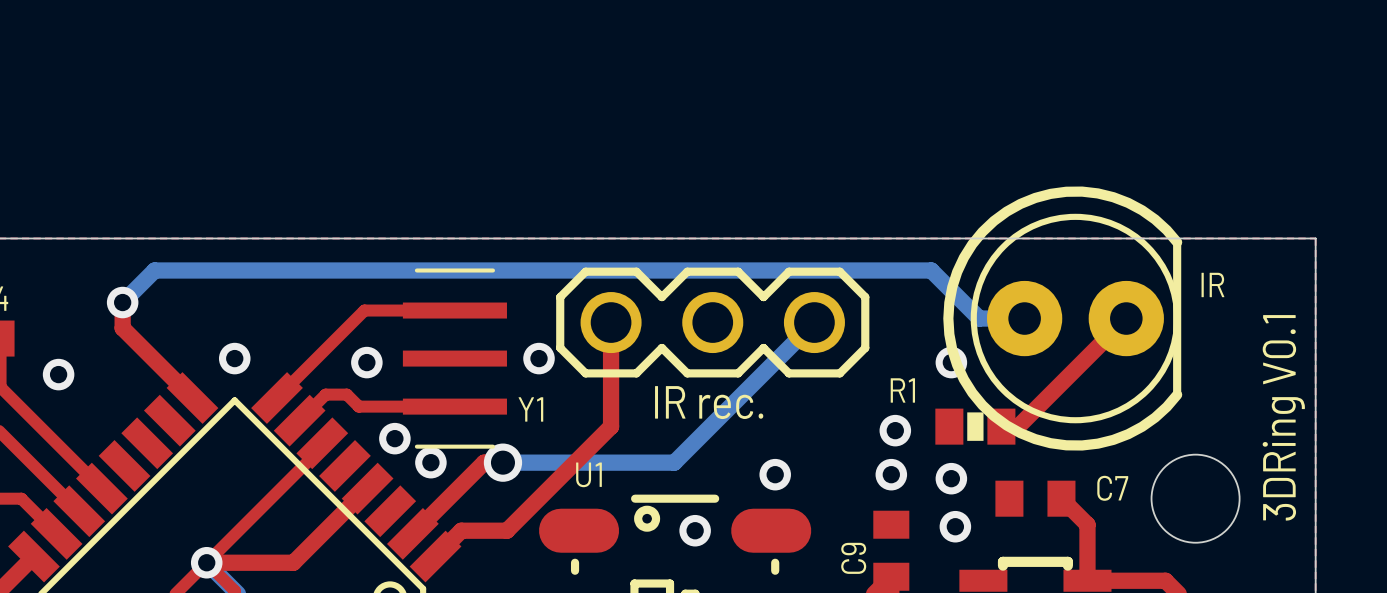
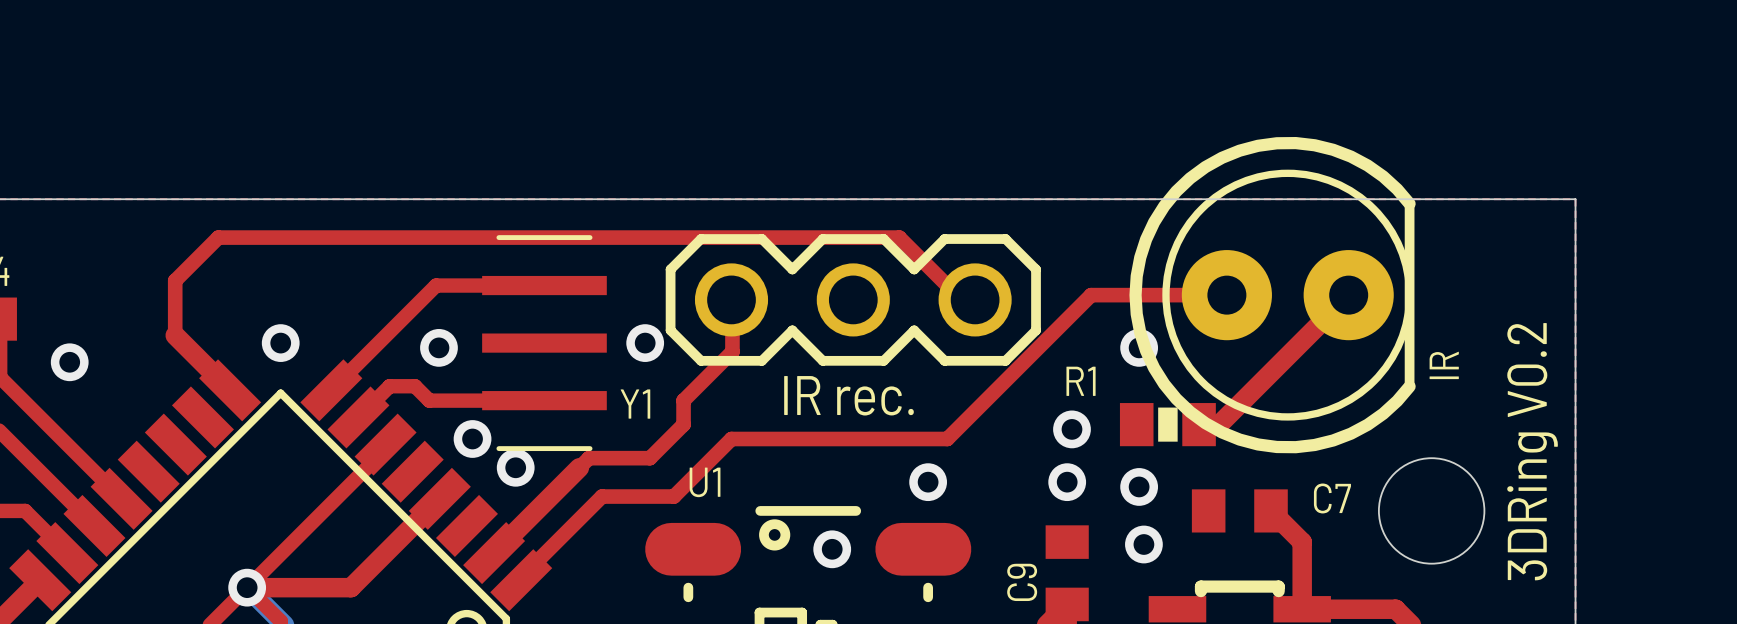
IR name rotation: 0° (1212, 284) -> 90° counterclockwise (1444, 365)
IR name position: IR (1212, 284) -> IR (1444, 365)
top track: (122, 302) (122, 328) (146, 352) -> (976, 299) (961, 299) (899, 237) (218, 237) (175, 280) (175, 335)
bottom track: (122, 302) (154, 270) (931, 270) (979, 318) (1024, 318) -> none
via: (122, 302) -> none
top track: none -> (1226, 295) (1091, 295) (947, 439) (731, 439) (673, 496) (602, 496) (521, 577) (521, 580)
top track: (611, 322) (611, 426) (506, 530) (461, 530) (435, 556) -> (732, 299) (732, 351) (683, 400) (683, 424) (649, 458) (589, 458) (579, 467)
bottom track: (814, 322) (674, 462) (502, 462) -> none
text: 3DRing V0.1 (1283, 417) -> 3DRing V0.2 (1532, 451)
via: (502, 462) -> none

